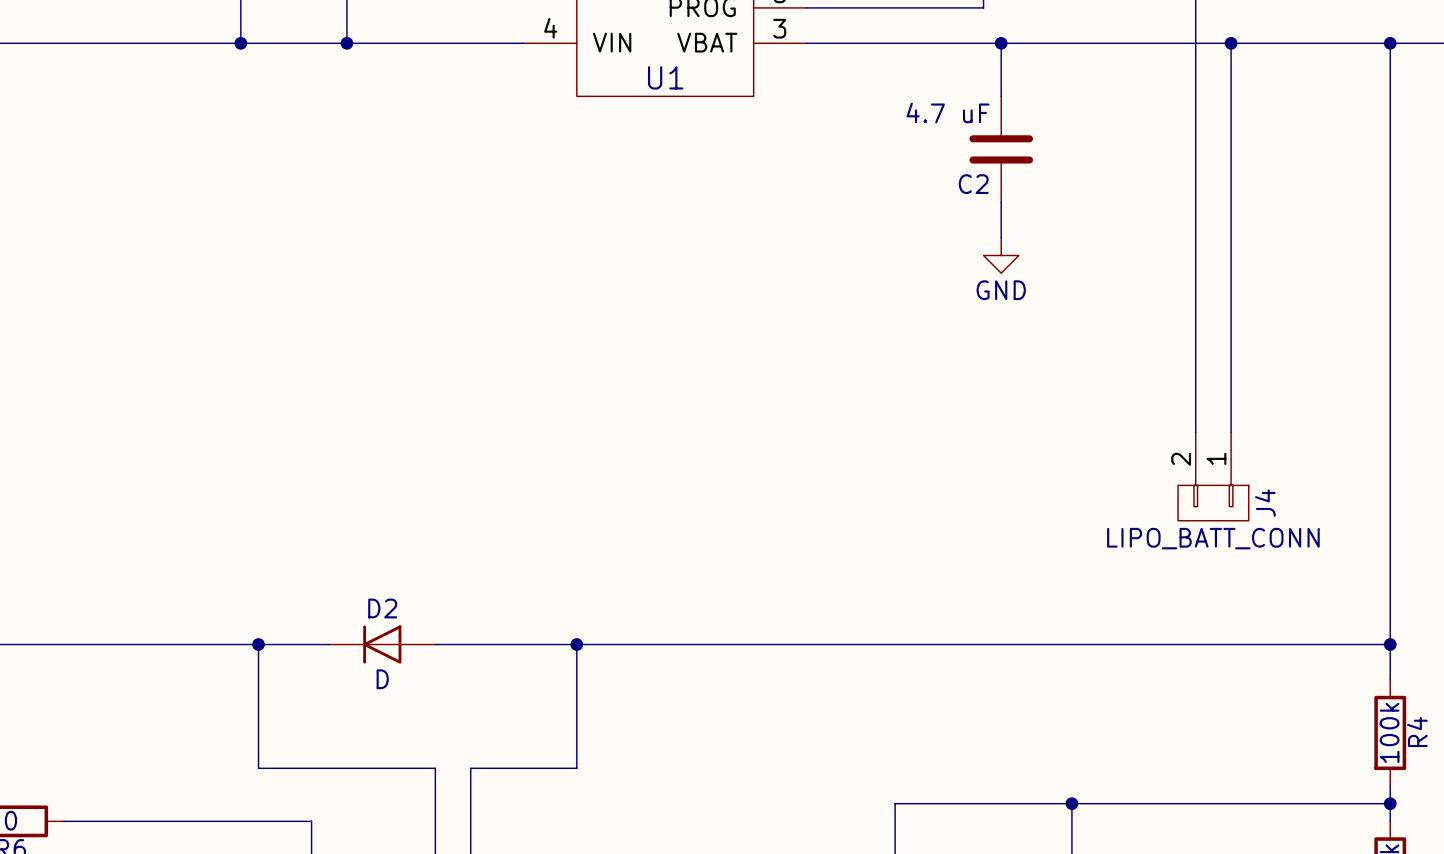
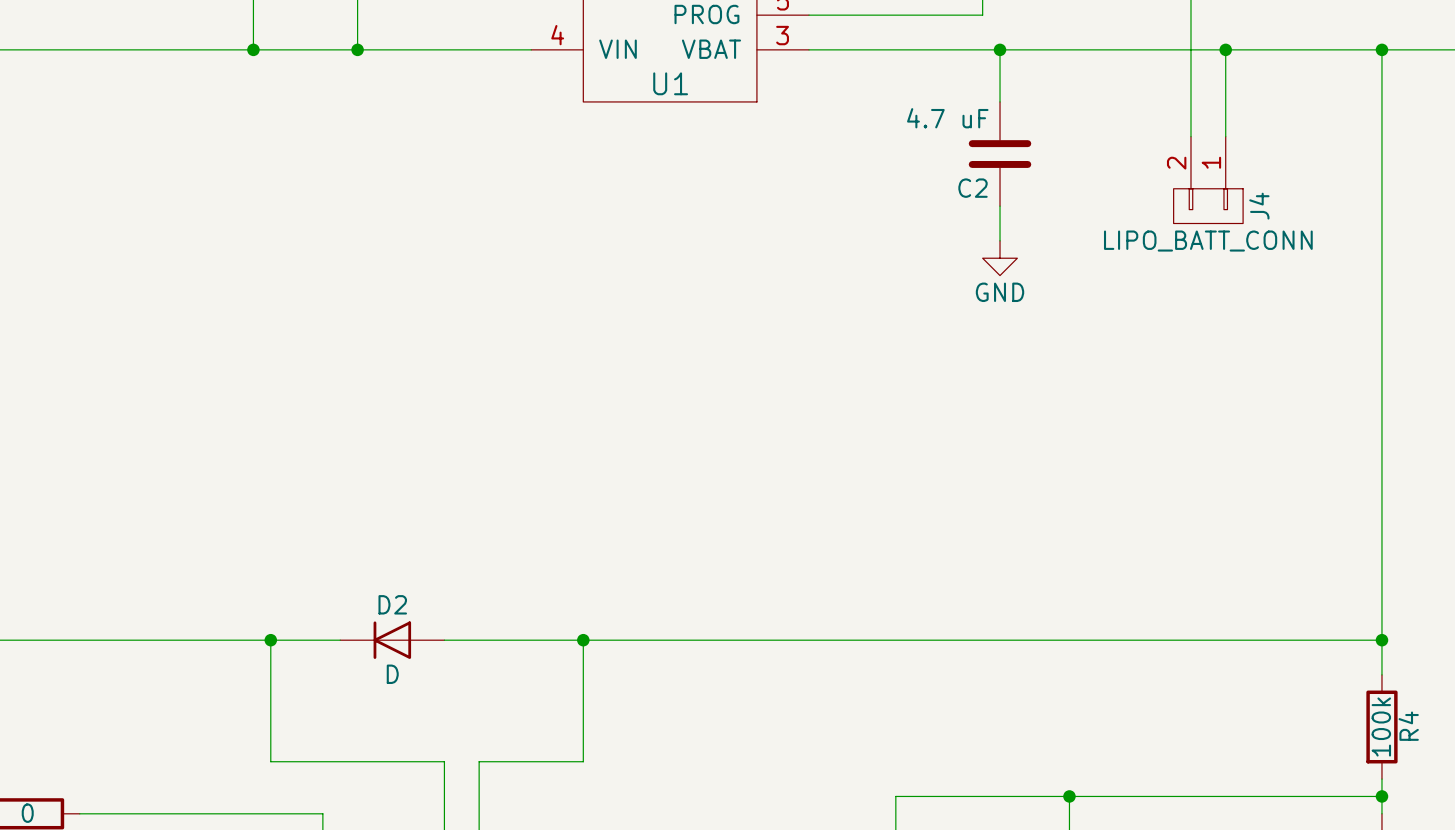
wire: (1195, 131) (1195, 432) -> none
wire: (1231, 131) (1231, 432) -> none
J4 position: (1213, 476) -> (1208, 180)

